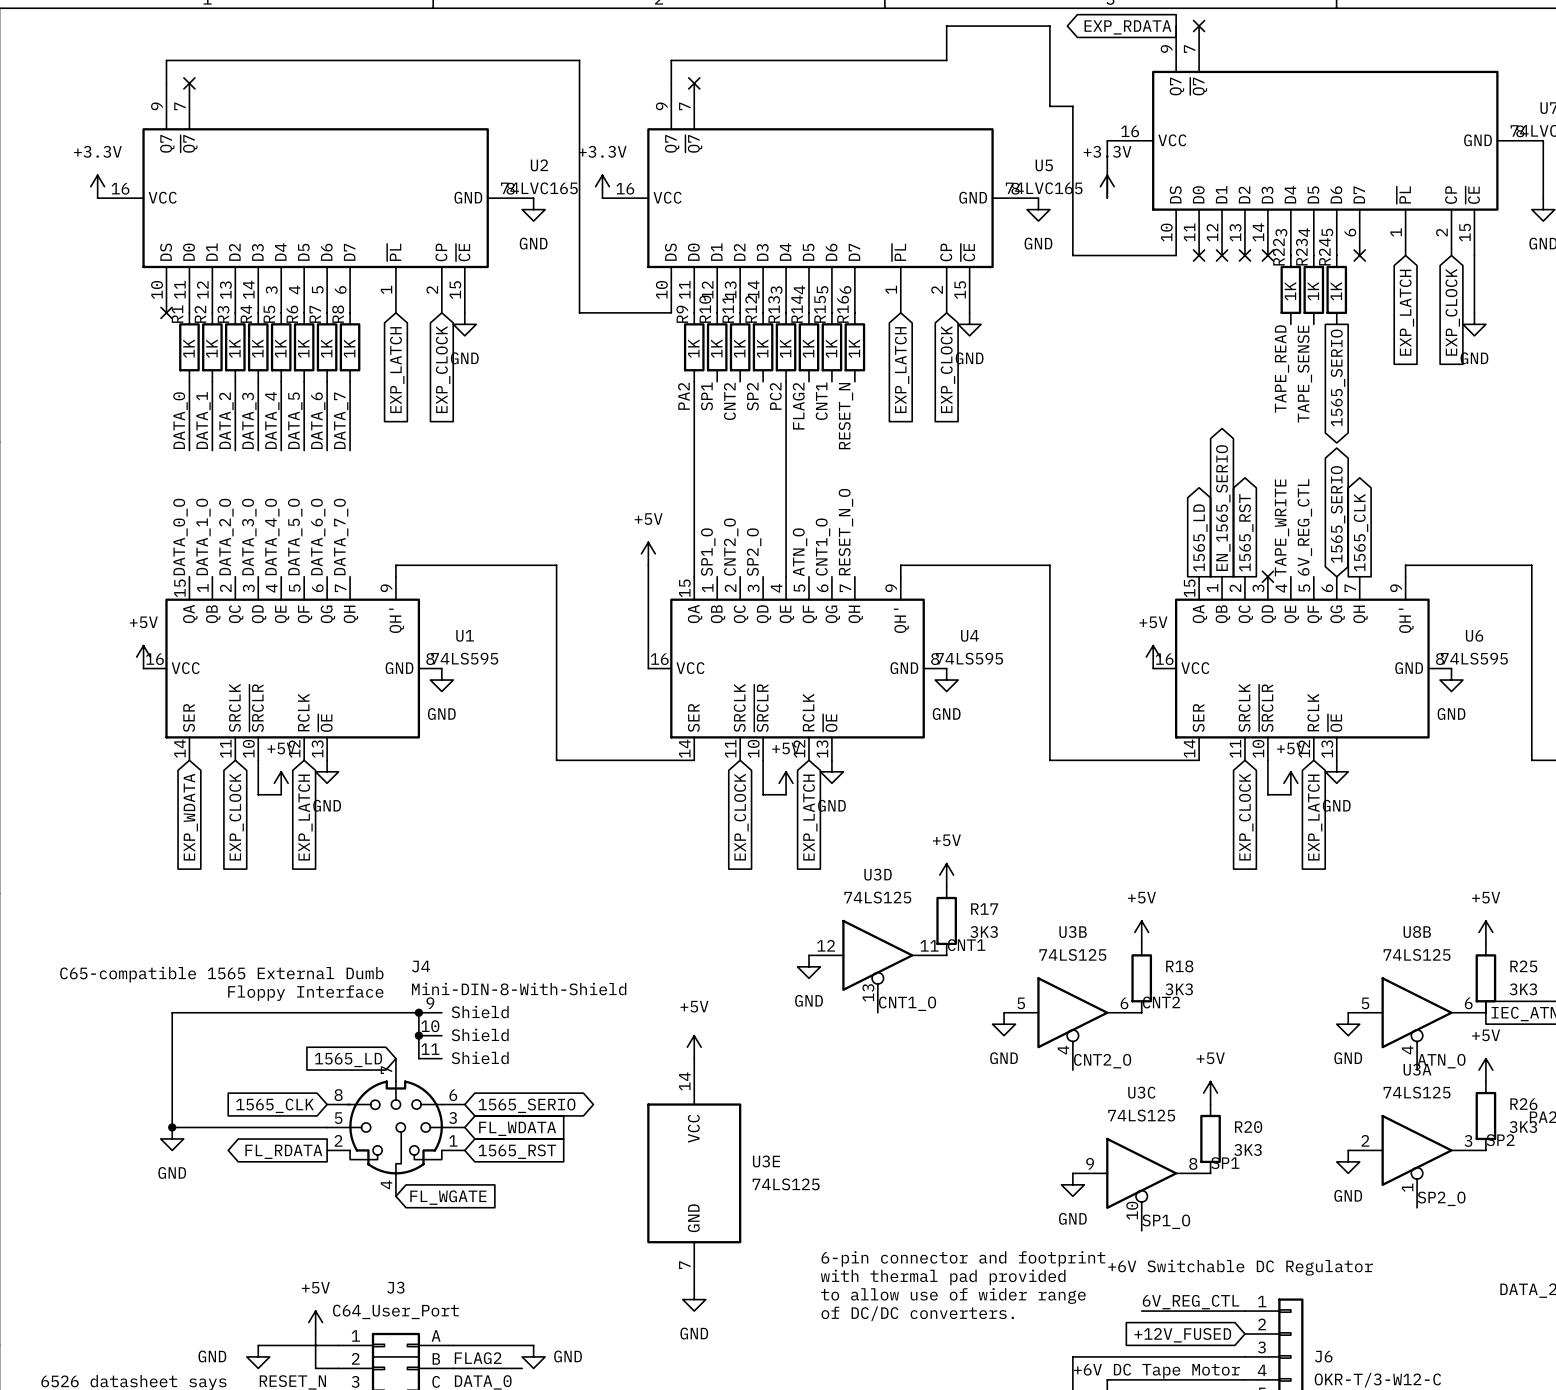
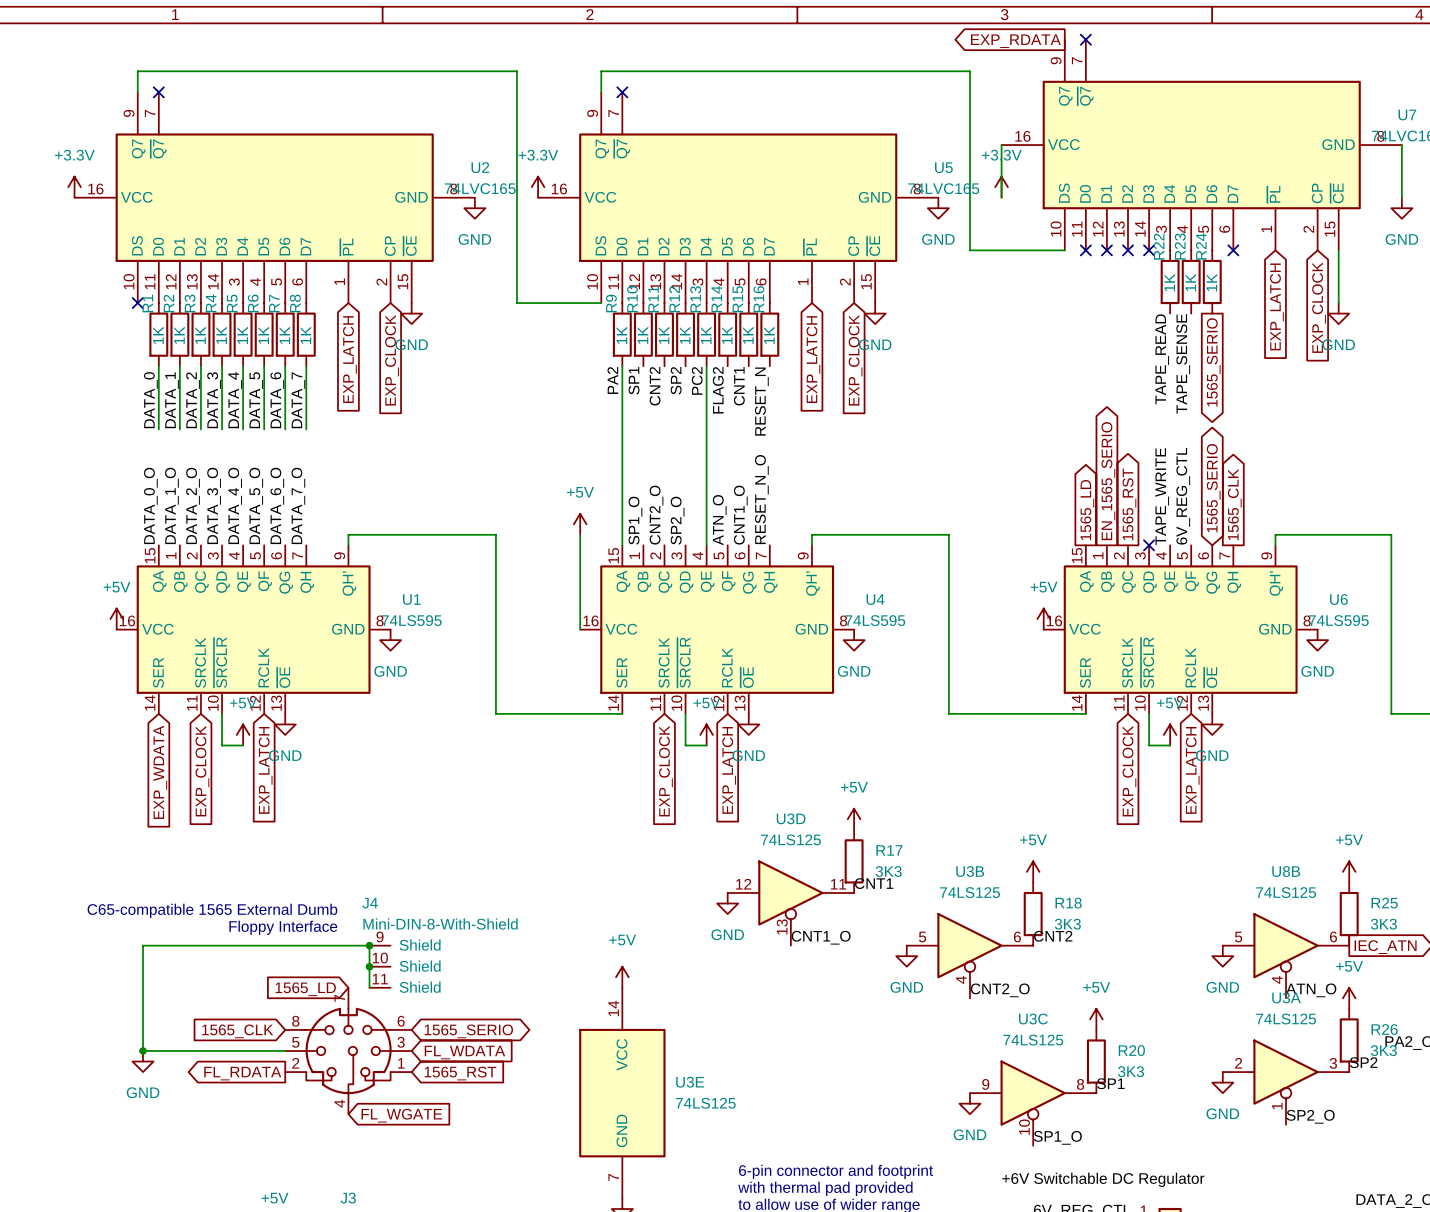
wire: (946, 60) (946, 26) (1049, 26) (1049, 106) (1072, 106) -> (854, 71) (969, 71) (969, 113)

